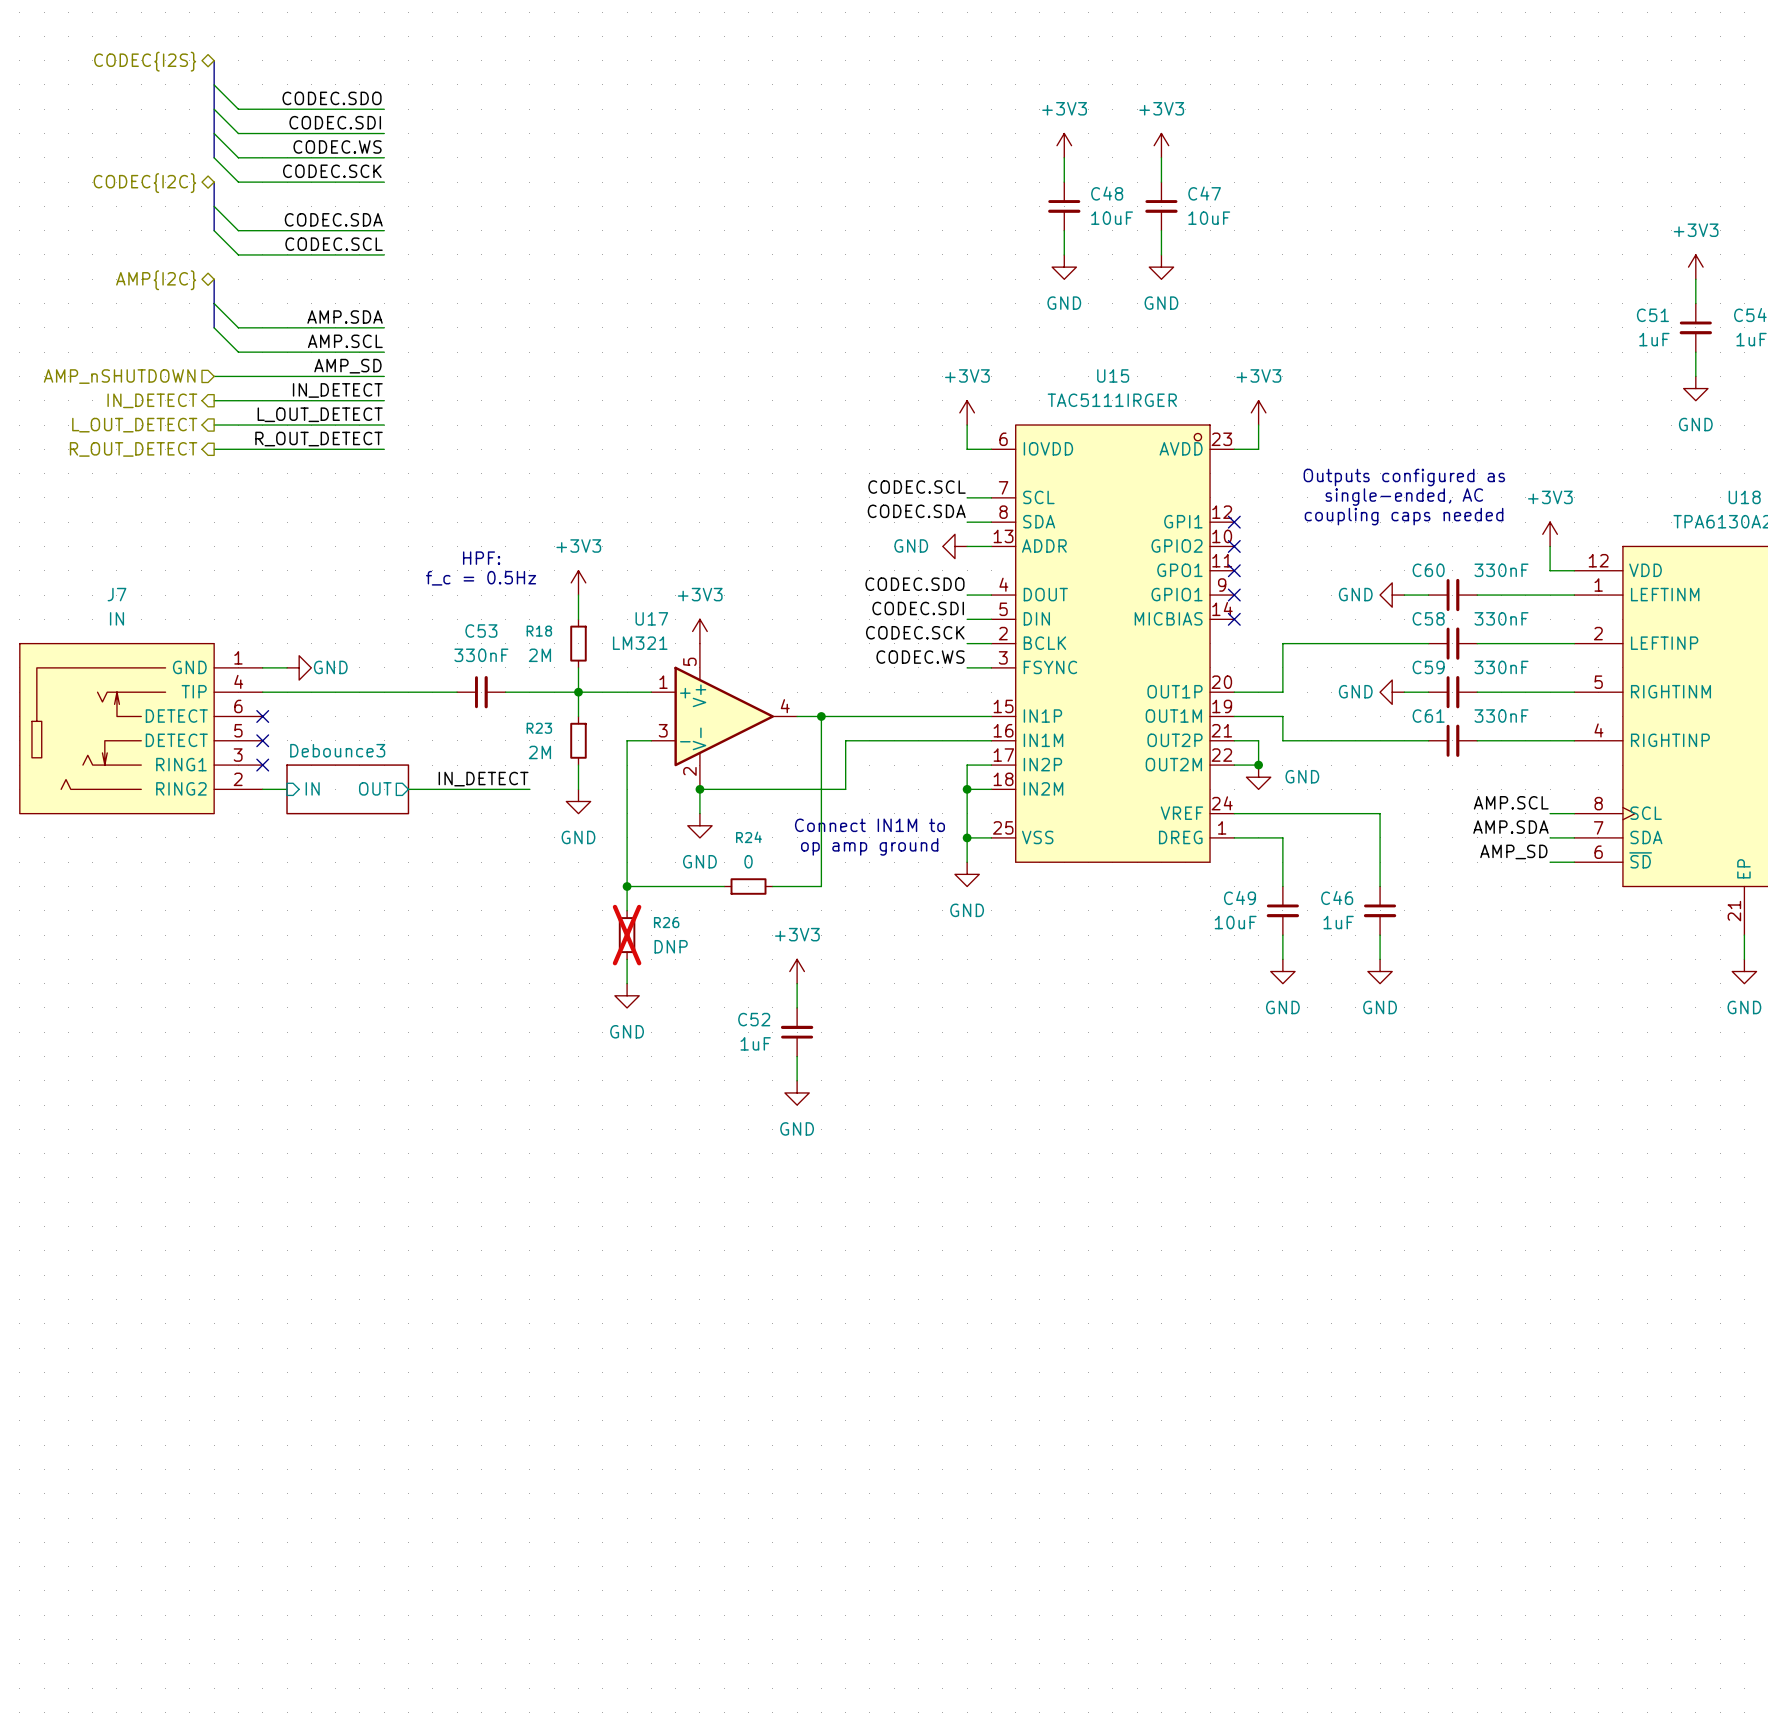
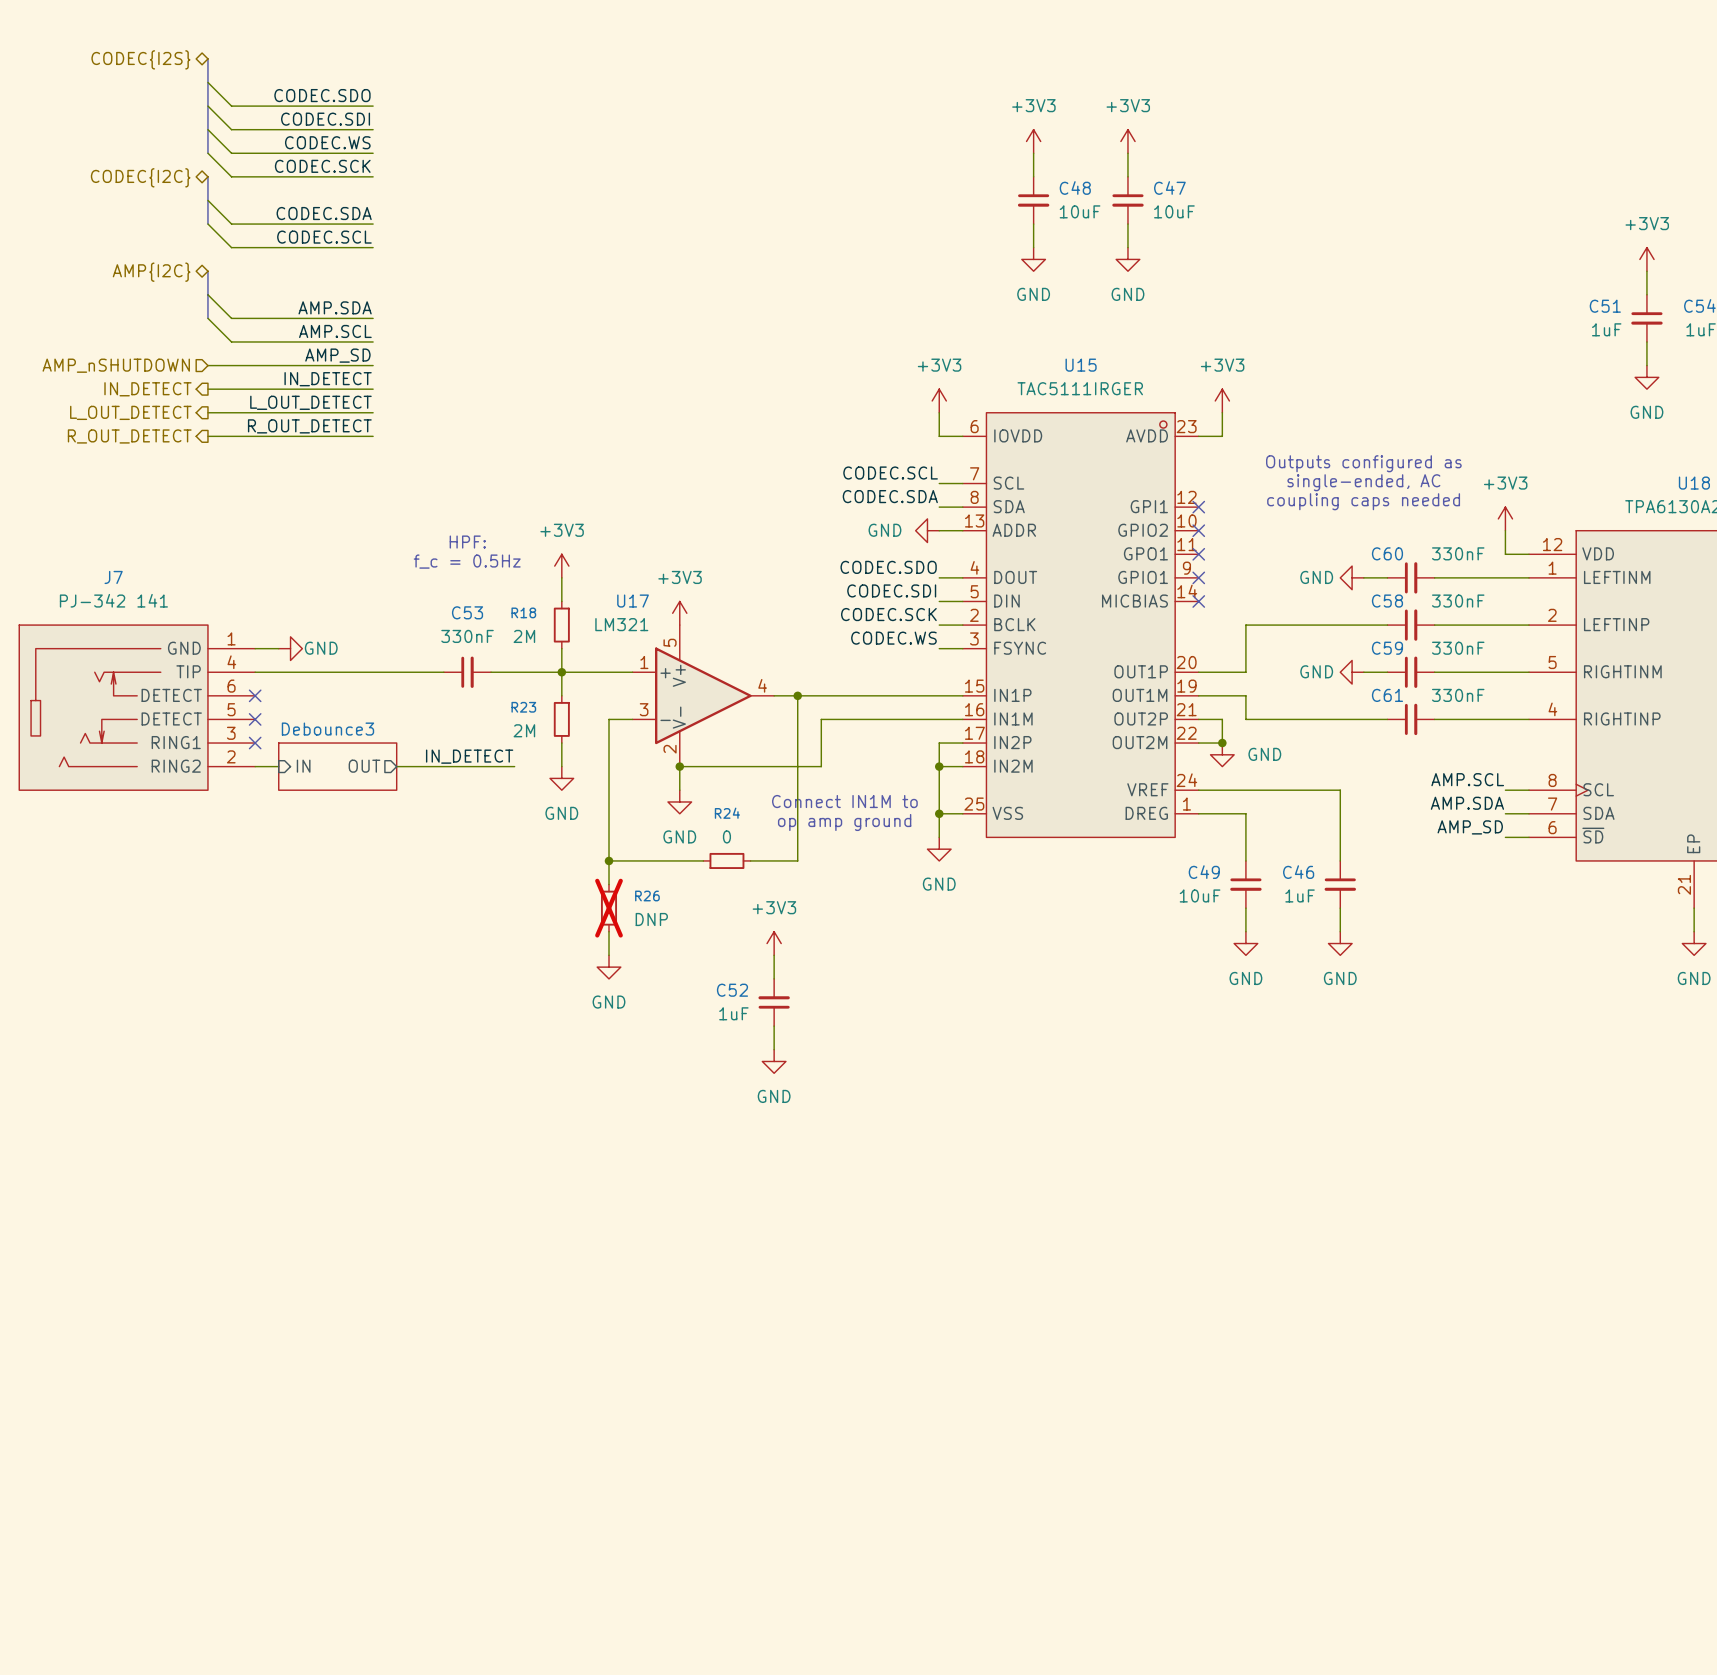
J7 value: IN (116, 618) -> PJ-342 141 (113, 600)

